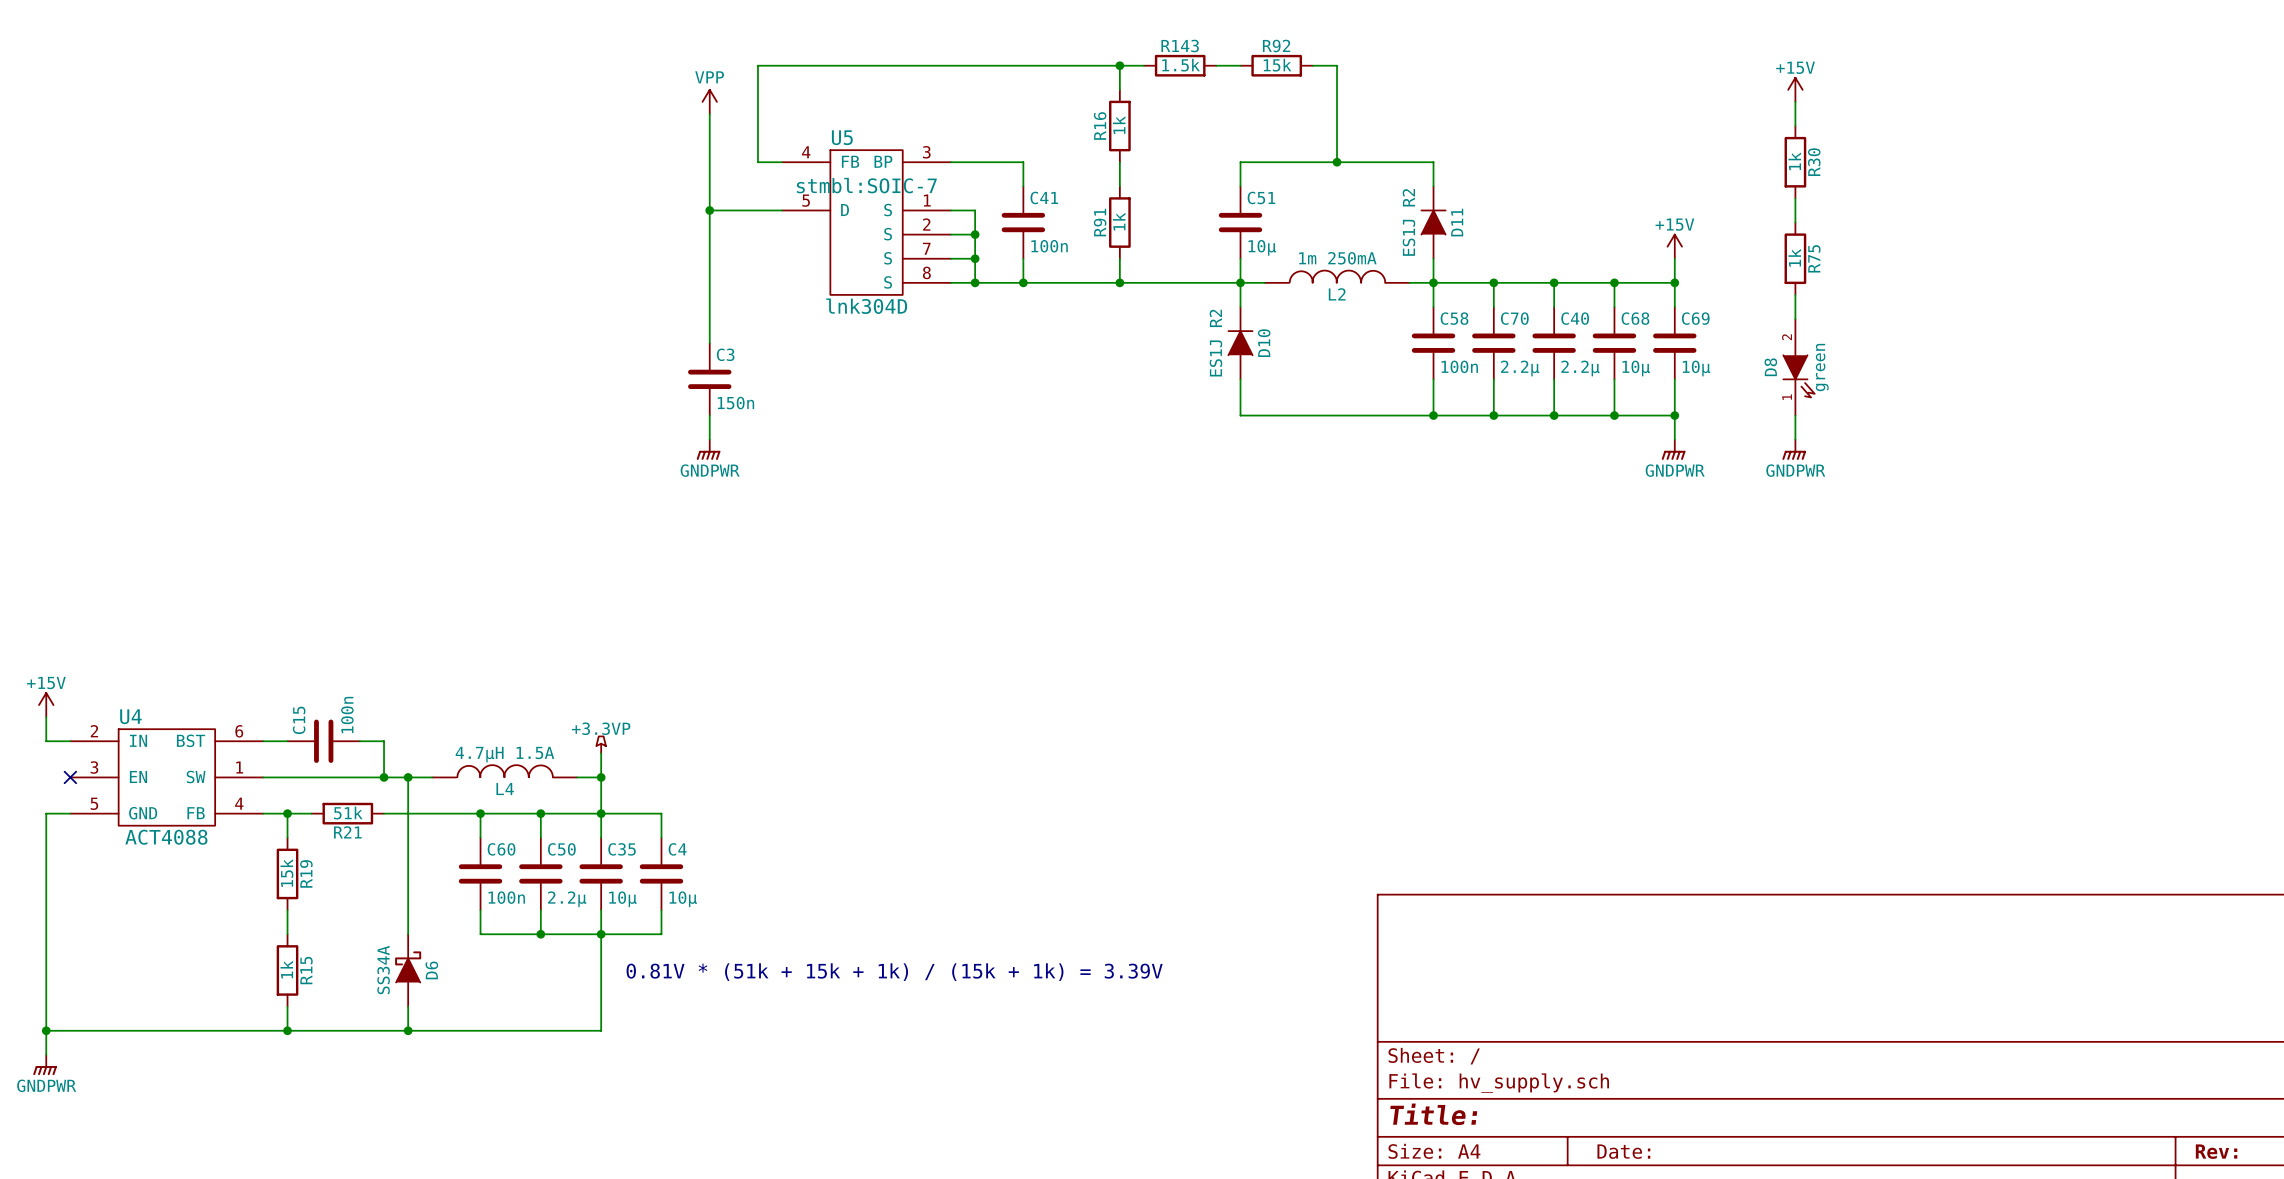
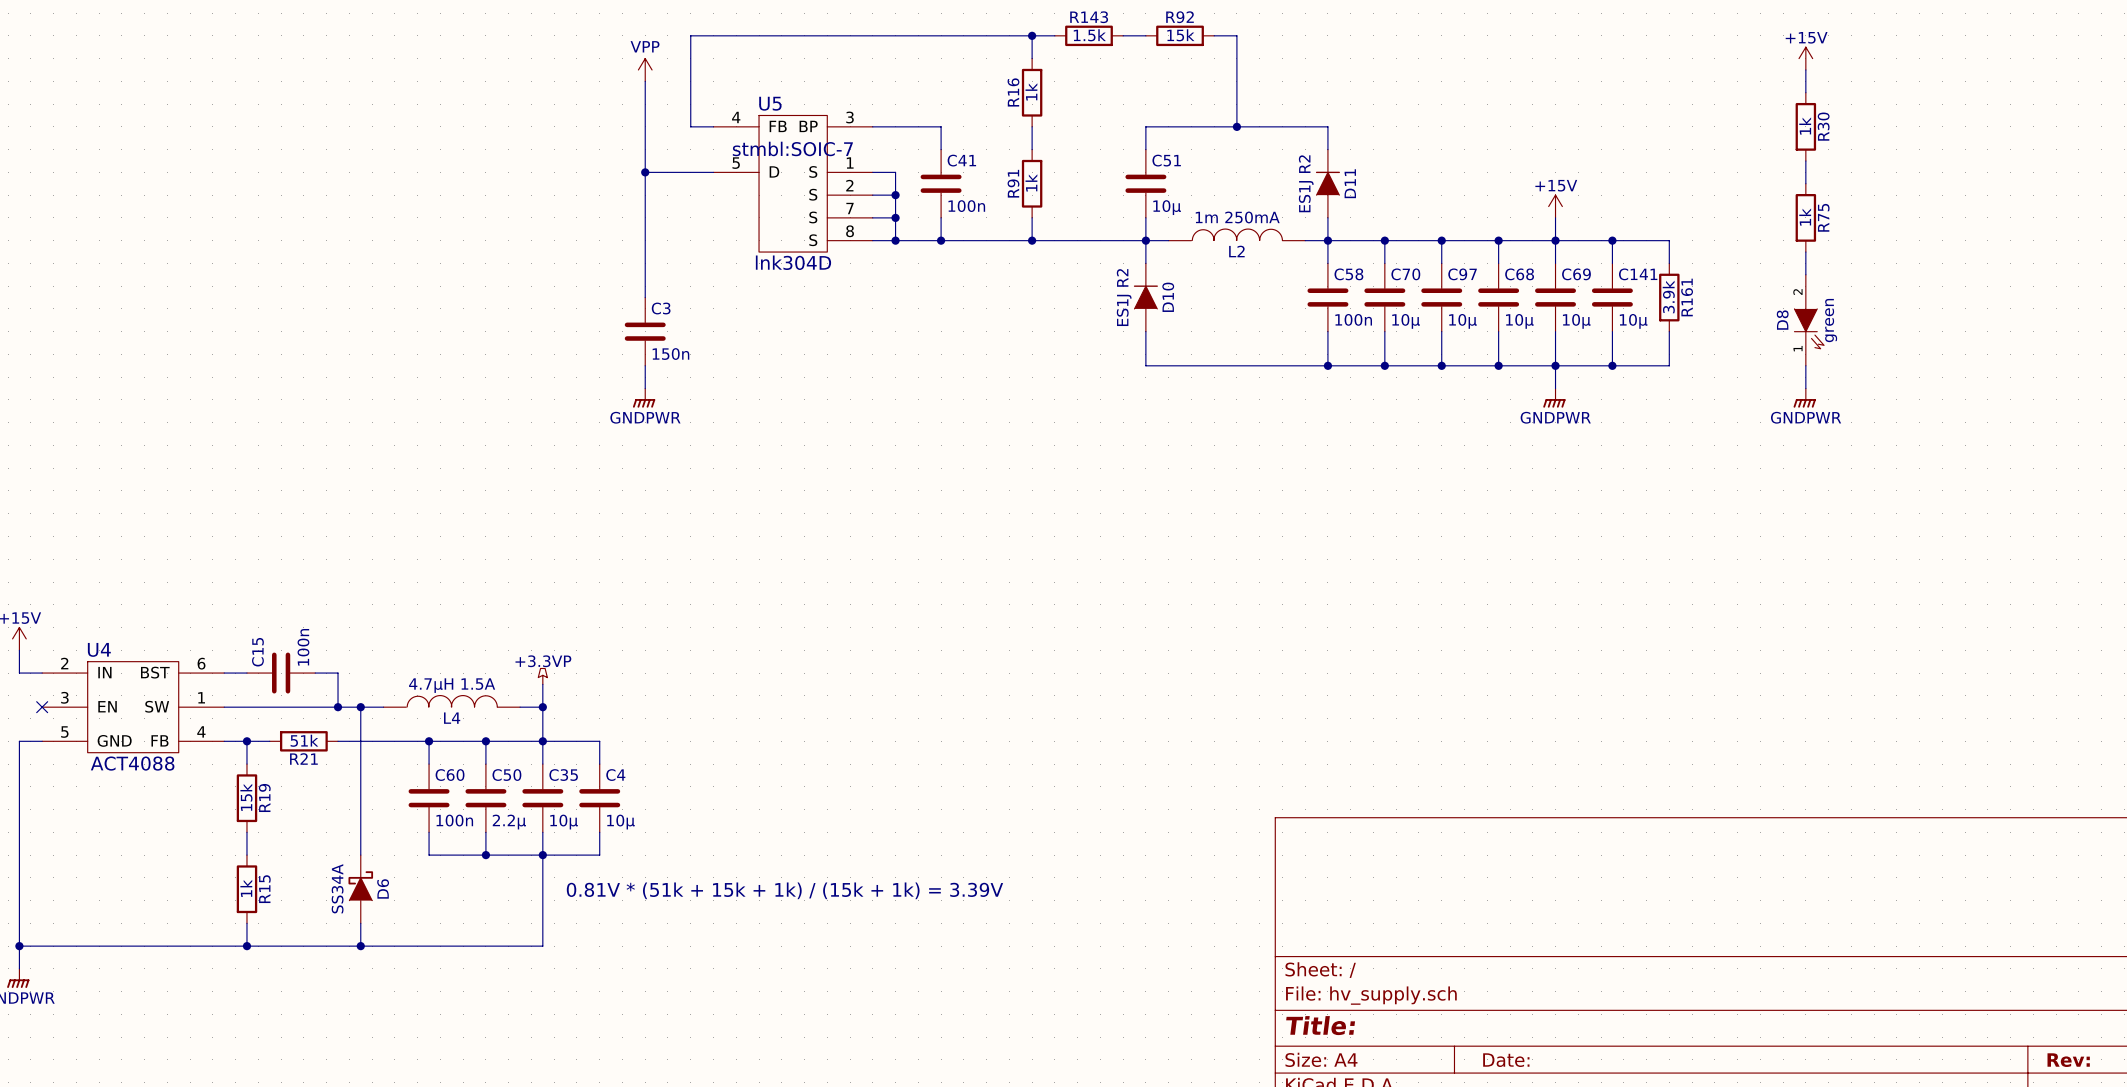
power symbol position: +15V (1795, 89) -> +15V (1805, 58)
wire: (1795, 101) (1795, 126) -> (1805, 69) (1805, 92)
R30 position: (1795, 162) -> (1805, 126)
wire: (1795, 198) (1795, 222) -> (1805, 161) (1805, 183)
R75 position: (1795, 258) -> (1805, 217)
wire: none -> (1555, 240) (1669, 240) (1669, 252)
wire: none -> (1612, 240) (1612, 263)
junction: none -> (1612, 240)
wire: none -> (1805, 252) (1805, 274)
C40 name: C40 (1575, 318) -> C97 (1462, 274)
C141: none -> 10µ (1612, 297)
R161: none -> 3.9k (1669, 297)
D8 position: (1799, 367) -> (1809, 320)
C70 value: 2.2µ (1520, 368) -> 10µ (1406, 321)
C40 value: 2.2µ (1580, 368) -> 10µ (1462, 321)
wire: none -> (1612, 331) (1612, 365)
wire: none -> (1669, 331) (1669, 365) (1555, 365)
junction: none -> (1612, 365)
wire: (1795, 415) (1795, 439) -> (1805, 365) (1805, 388)
power symbol position: GNDPWR (1794, 449) -> GNDPWR (1804, 398)

